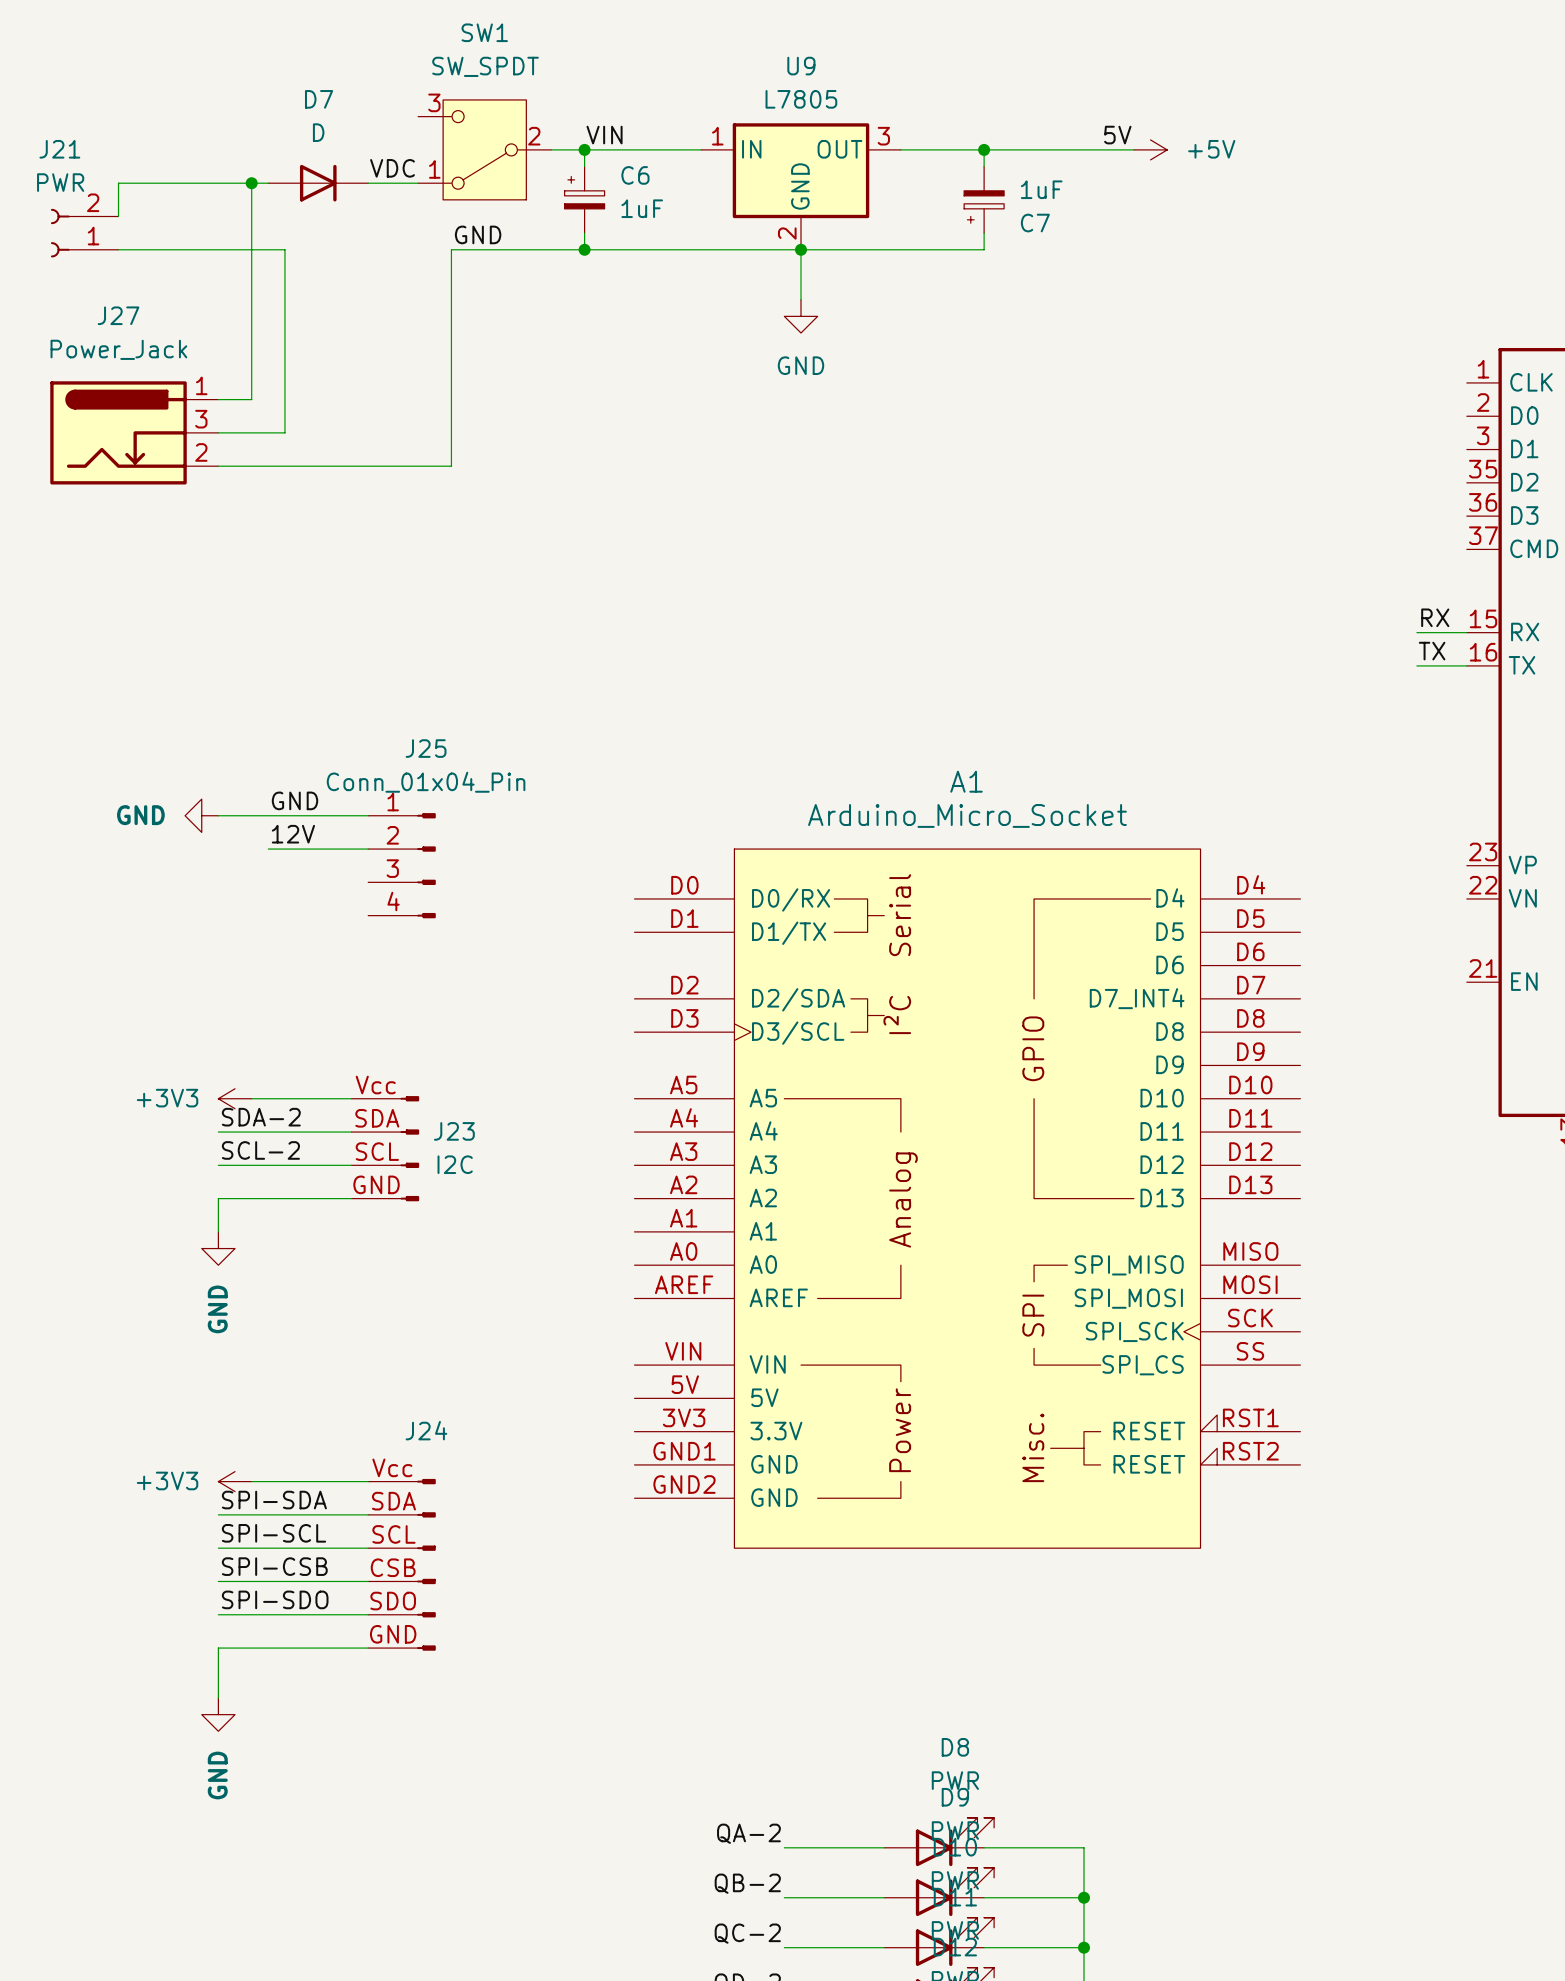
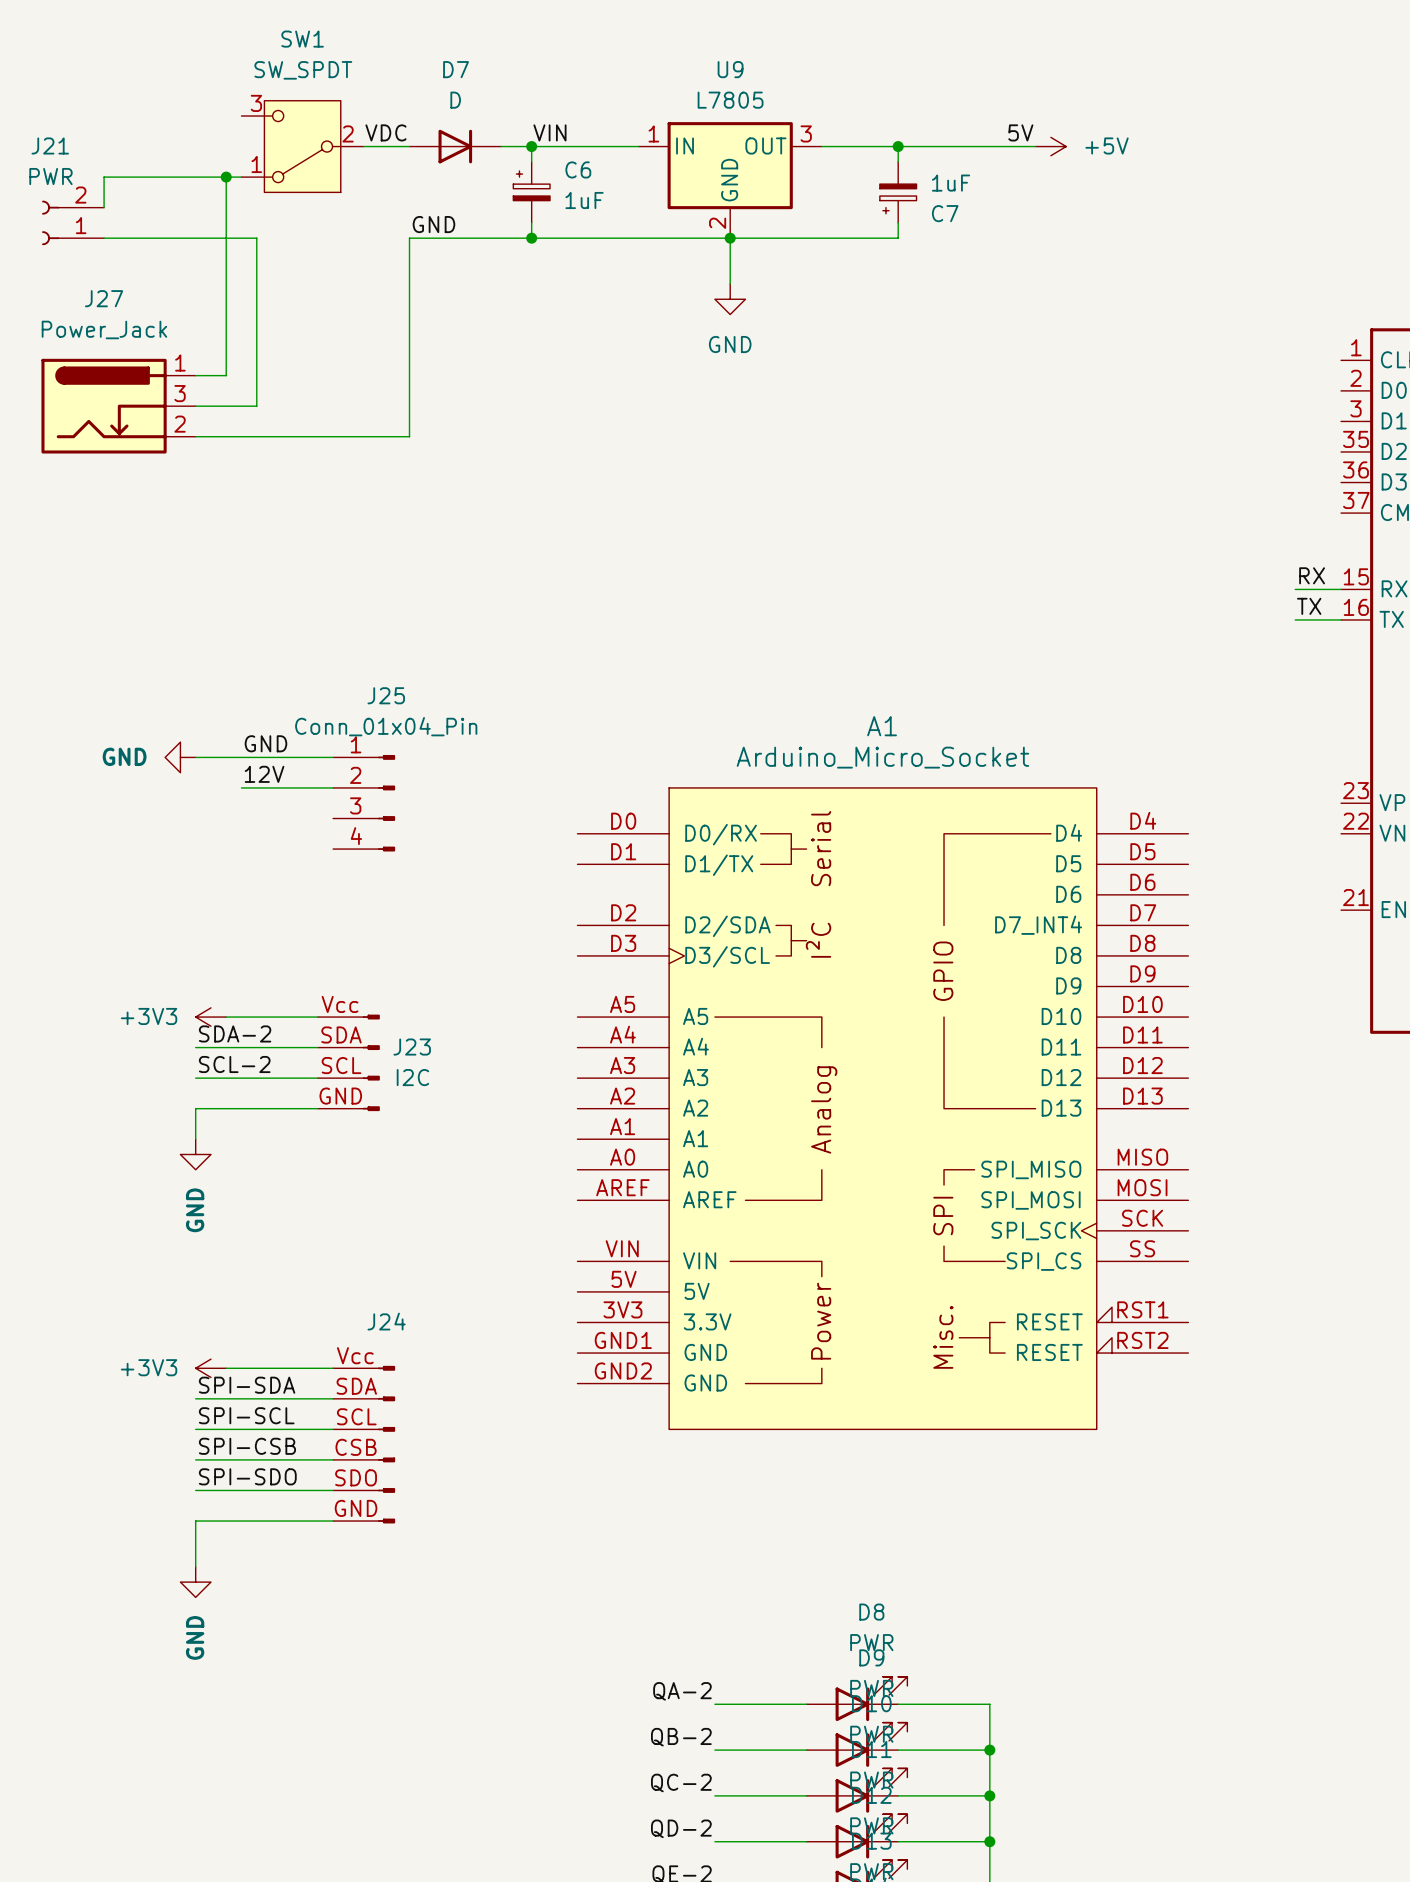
SW1 position: (484, 149) -> (302, 146)
label position: VDC (392, 168) -> VDC (385, 132)
D7 position: (318, 183) -> (455, 146)
wire: (368, 183) (418, 183) -> (363, 146) (409, 146)

